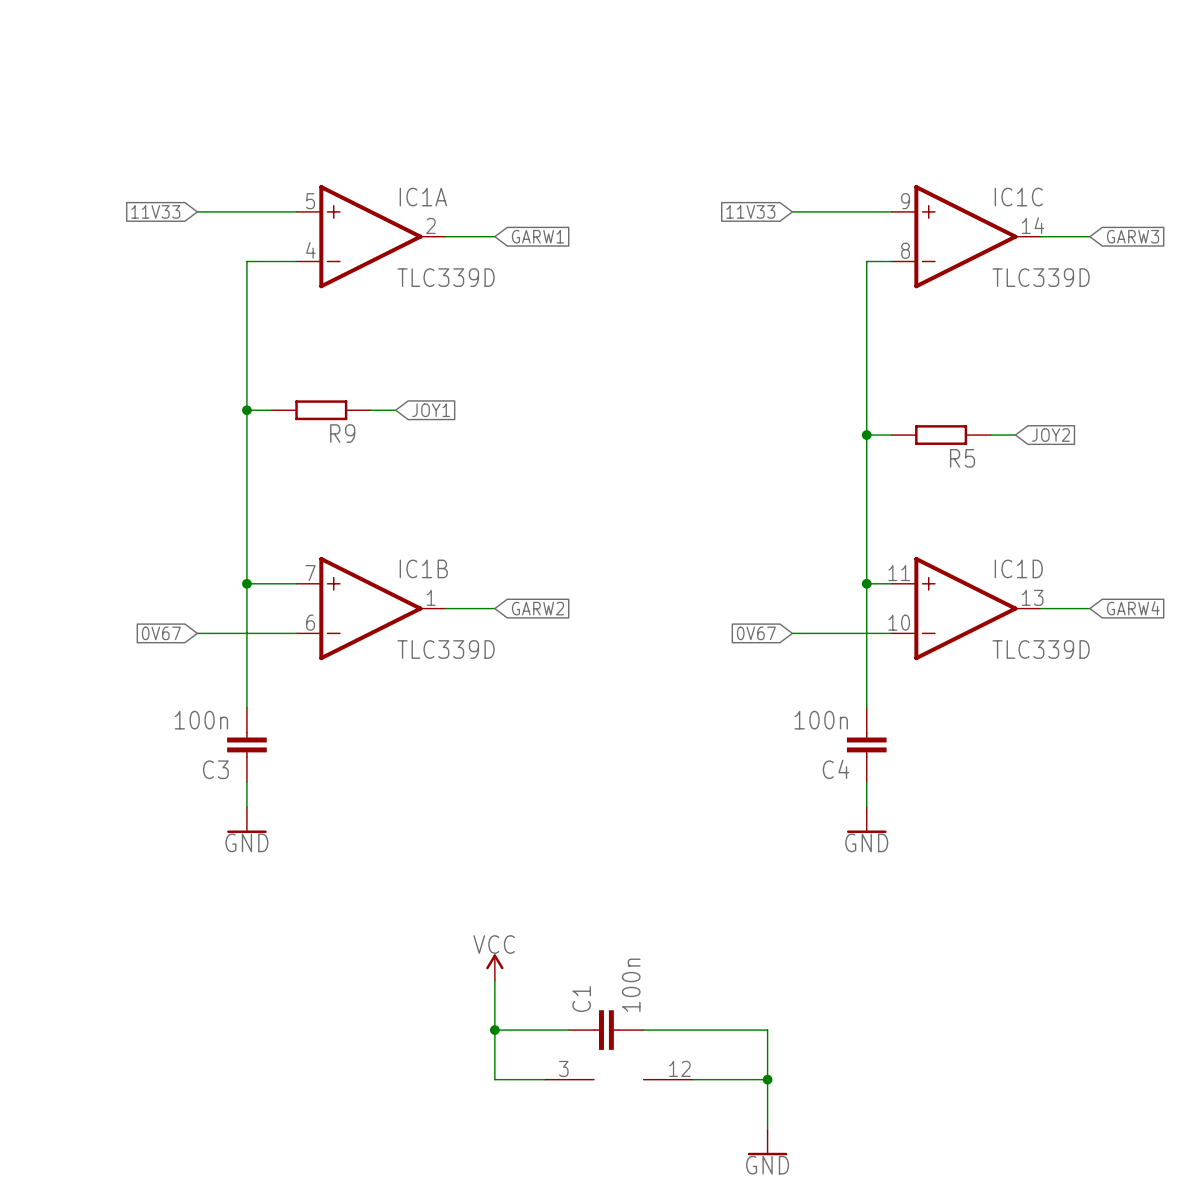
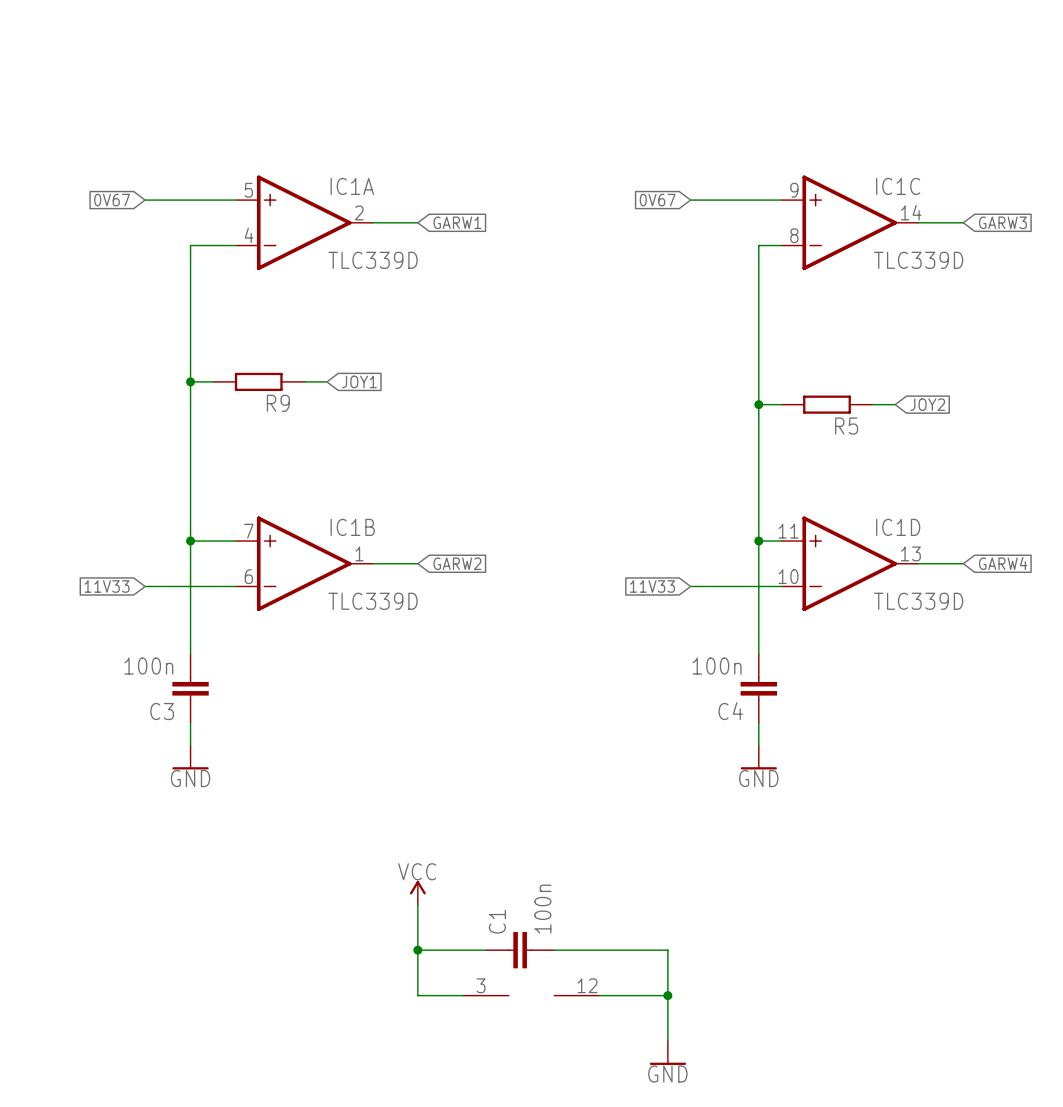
global label: 11V33 (155, 211) -> 0V67 (112, 200)
global label: 11V33 (750, 211) -> 0V67 (657, 200)
global label: 0V67 (161, 633) -> 11V33 (106, 586)
global label: 0V67 (756, 633) -> 11V33 (652, 586)

